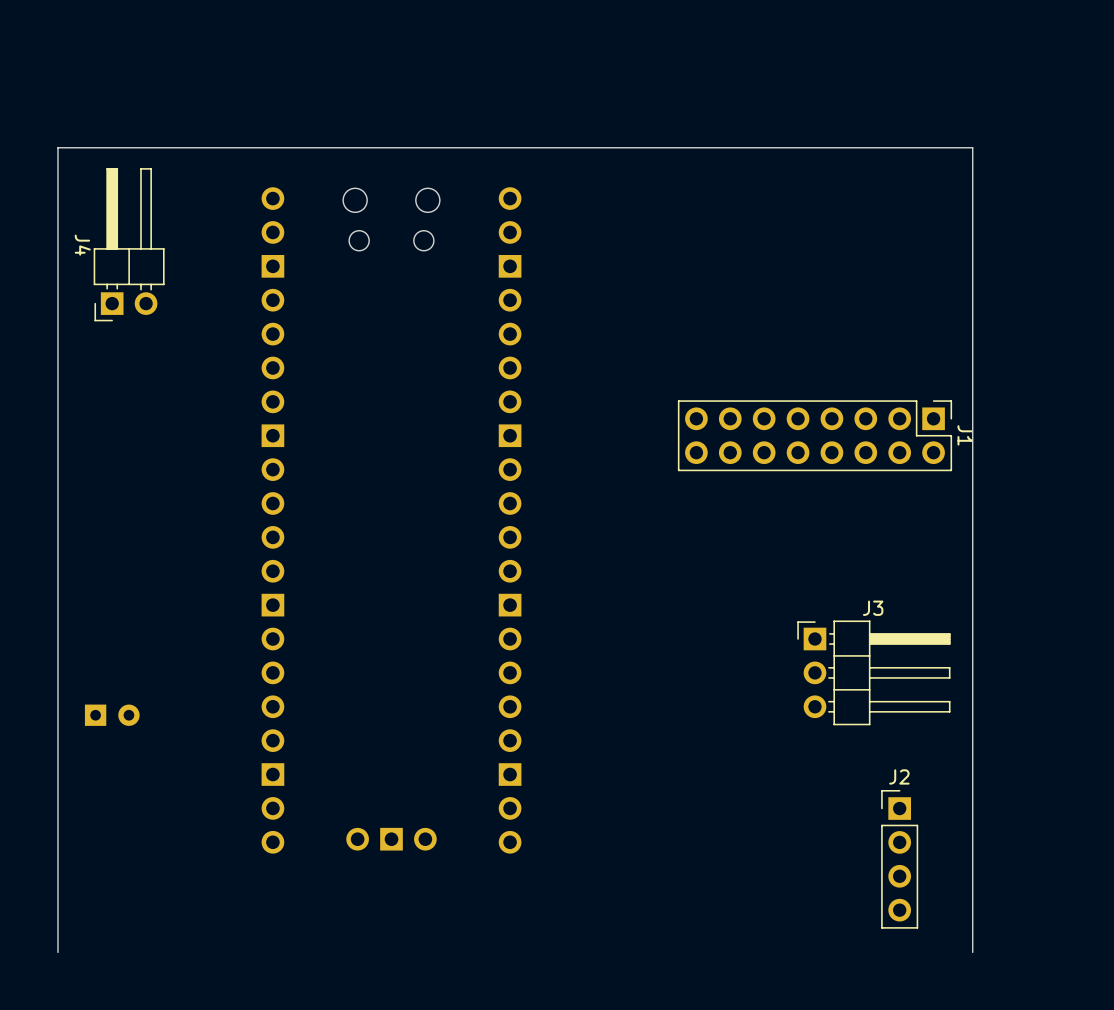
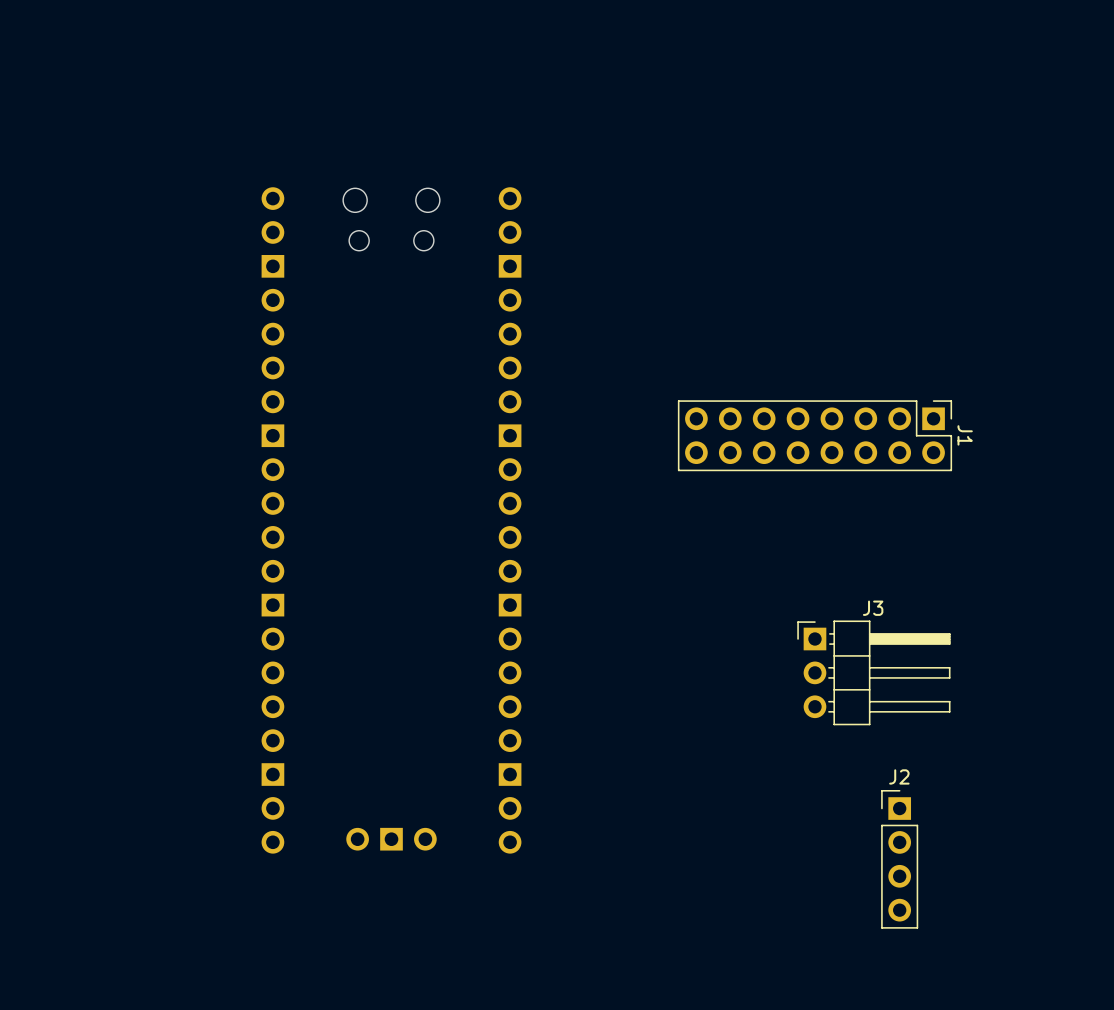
J4: (129, 244) -> none
part: (112, 715) -> none
board edge: (972, 952) (972, 147) (57, 147) (57, 952) -> none

